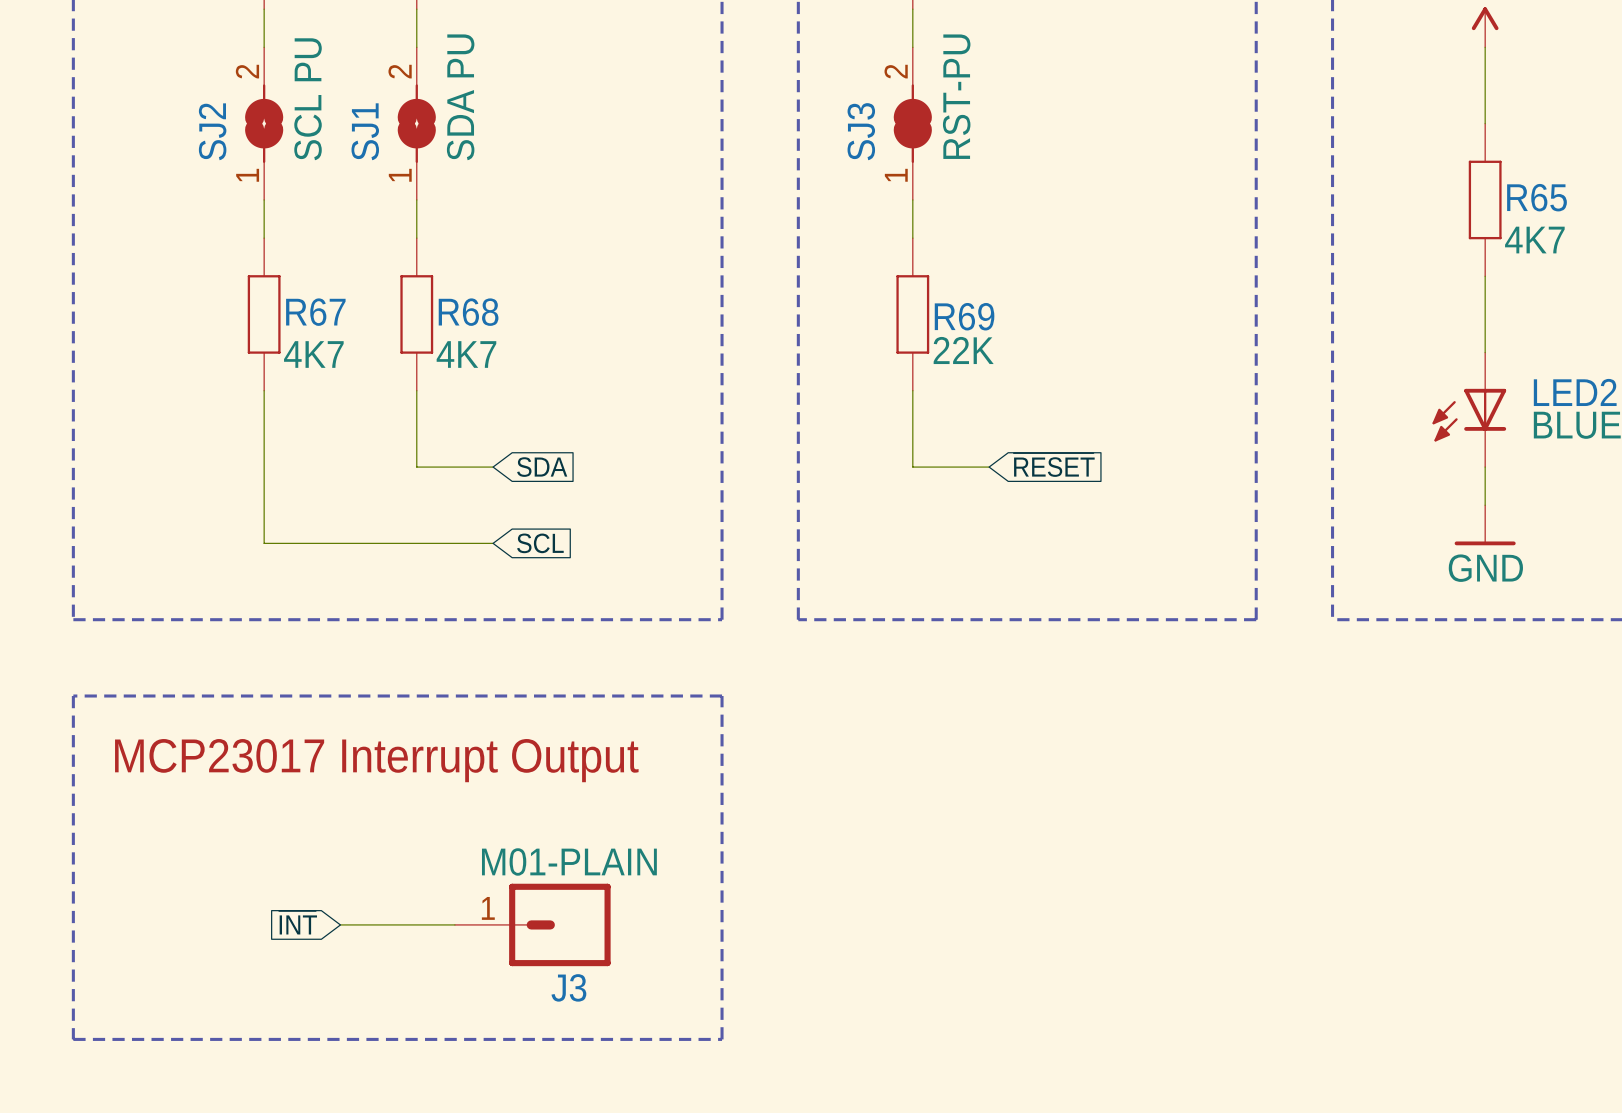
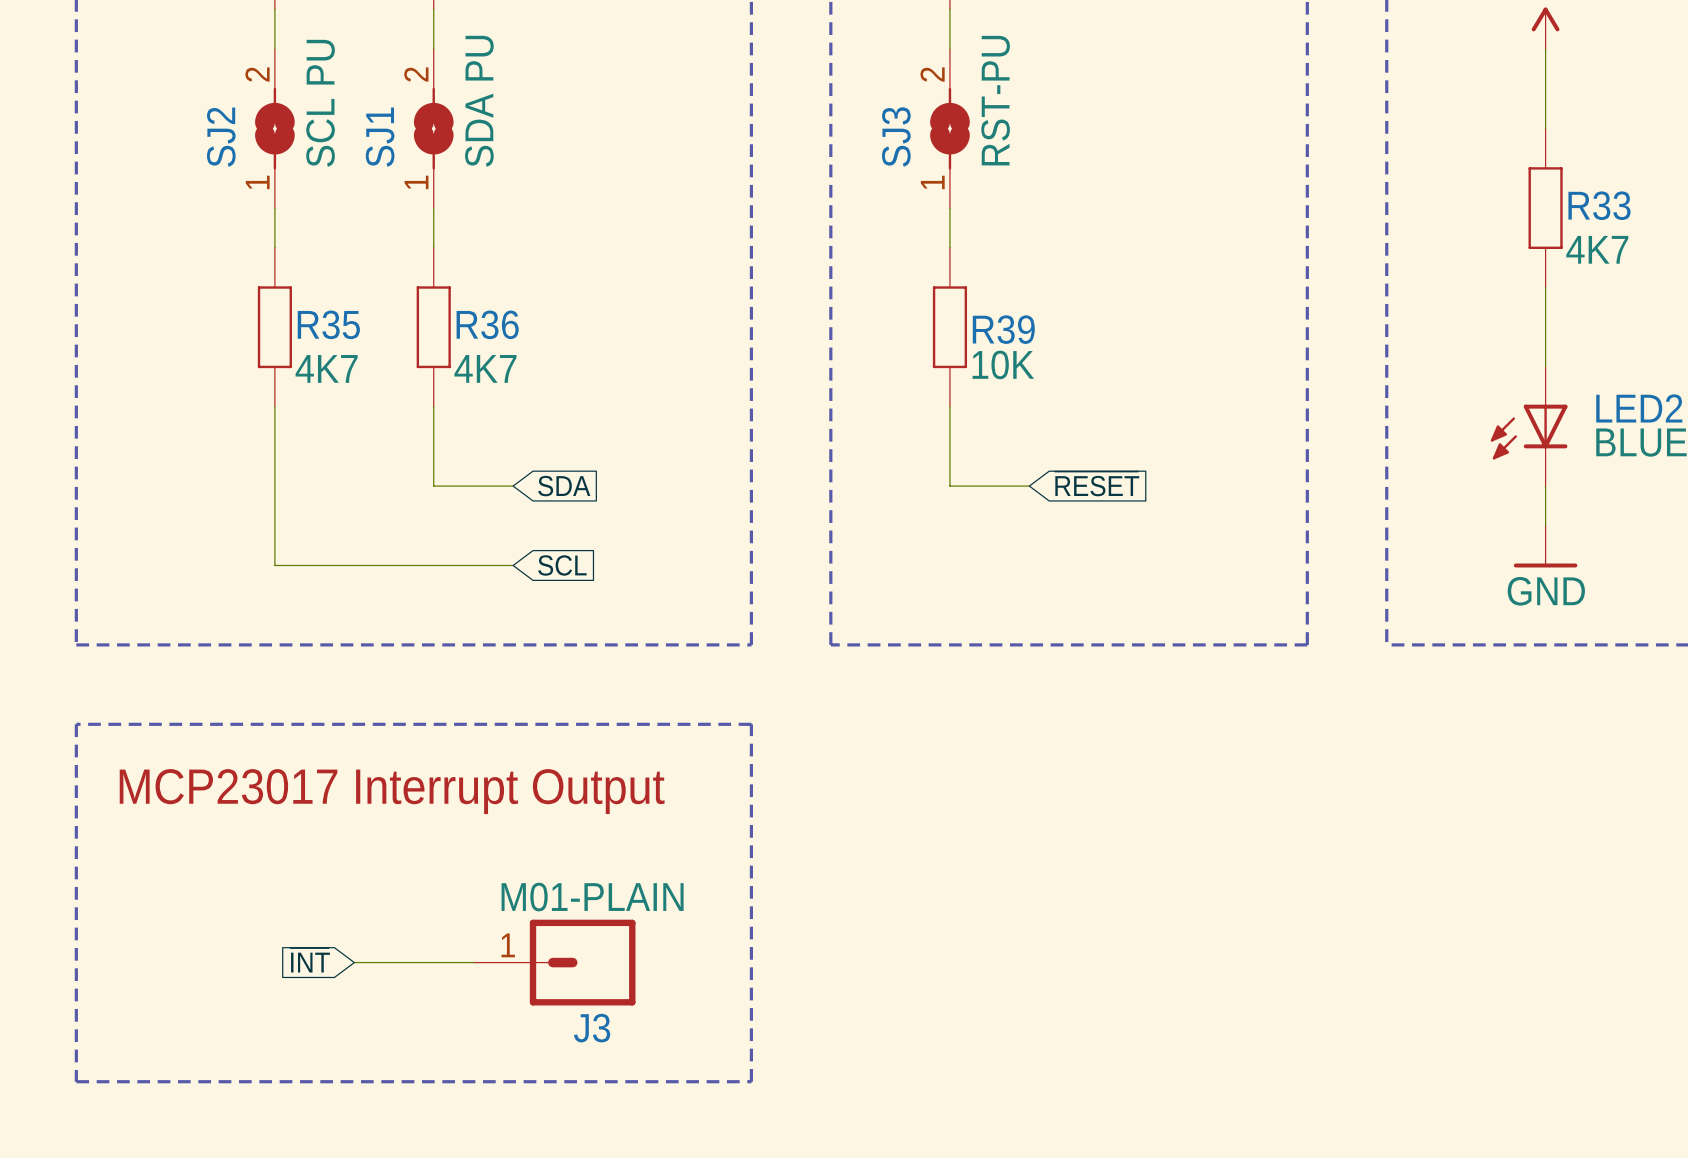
SJ3 symbol: [893, 47, 932, 200] -> [930, 49, 970, 209]
R65 name: R65 (1537, 197) -> R33 (1599, 205)
R67 name: R67 (315, 312) -> R35 (328, 324)
R68 name: R68 (468, 312) -> R36 (487, 324)
R69 name: R69 (964, 316) -> R39 (1003, 329)
R69 value: 22K (963, 350) -> 10K (1003, 364)

